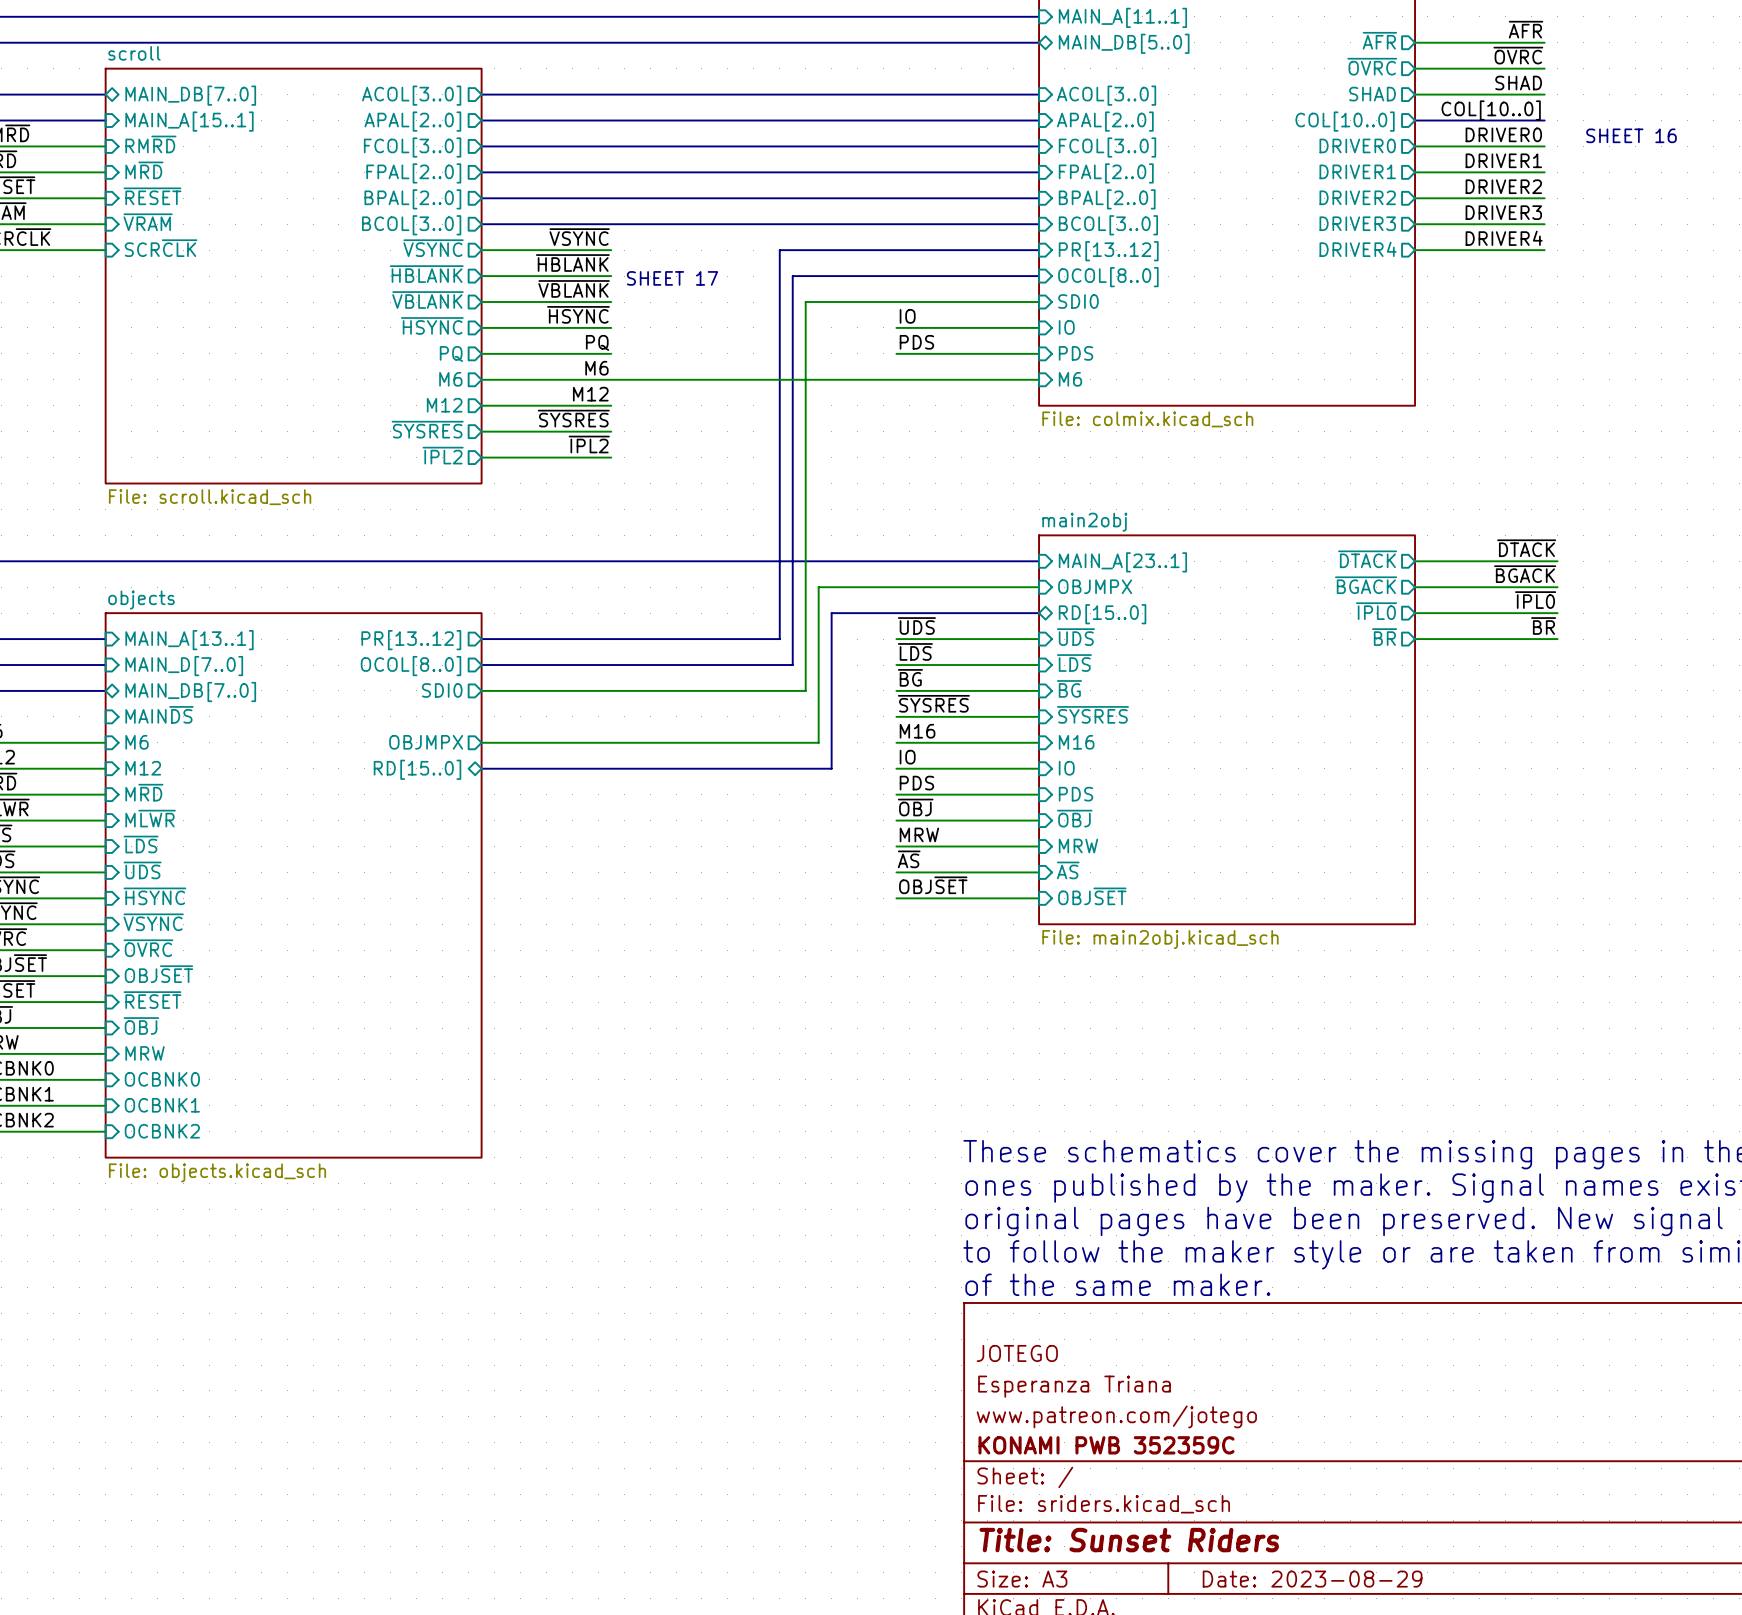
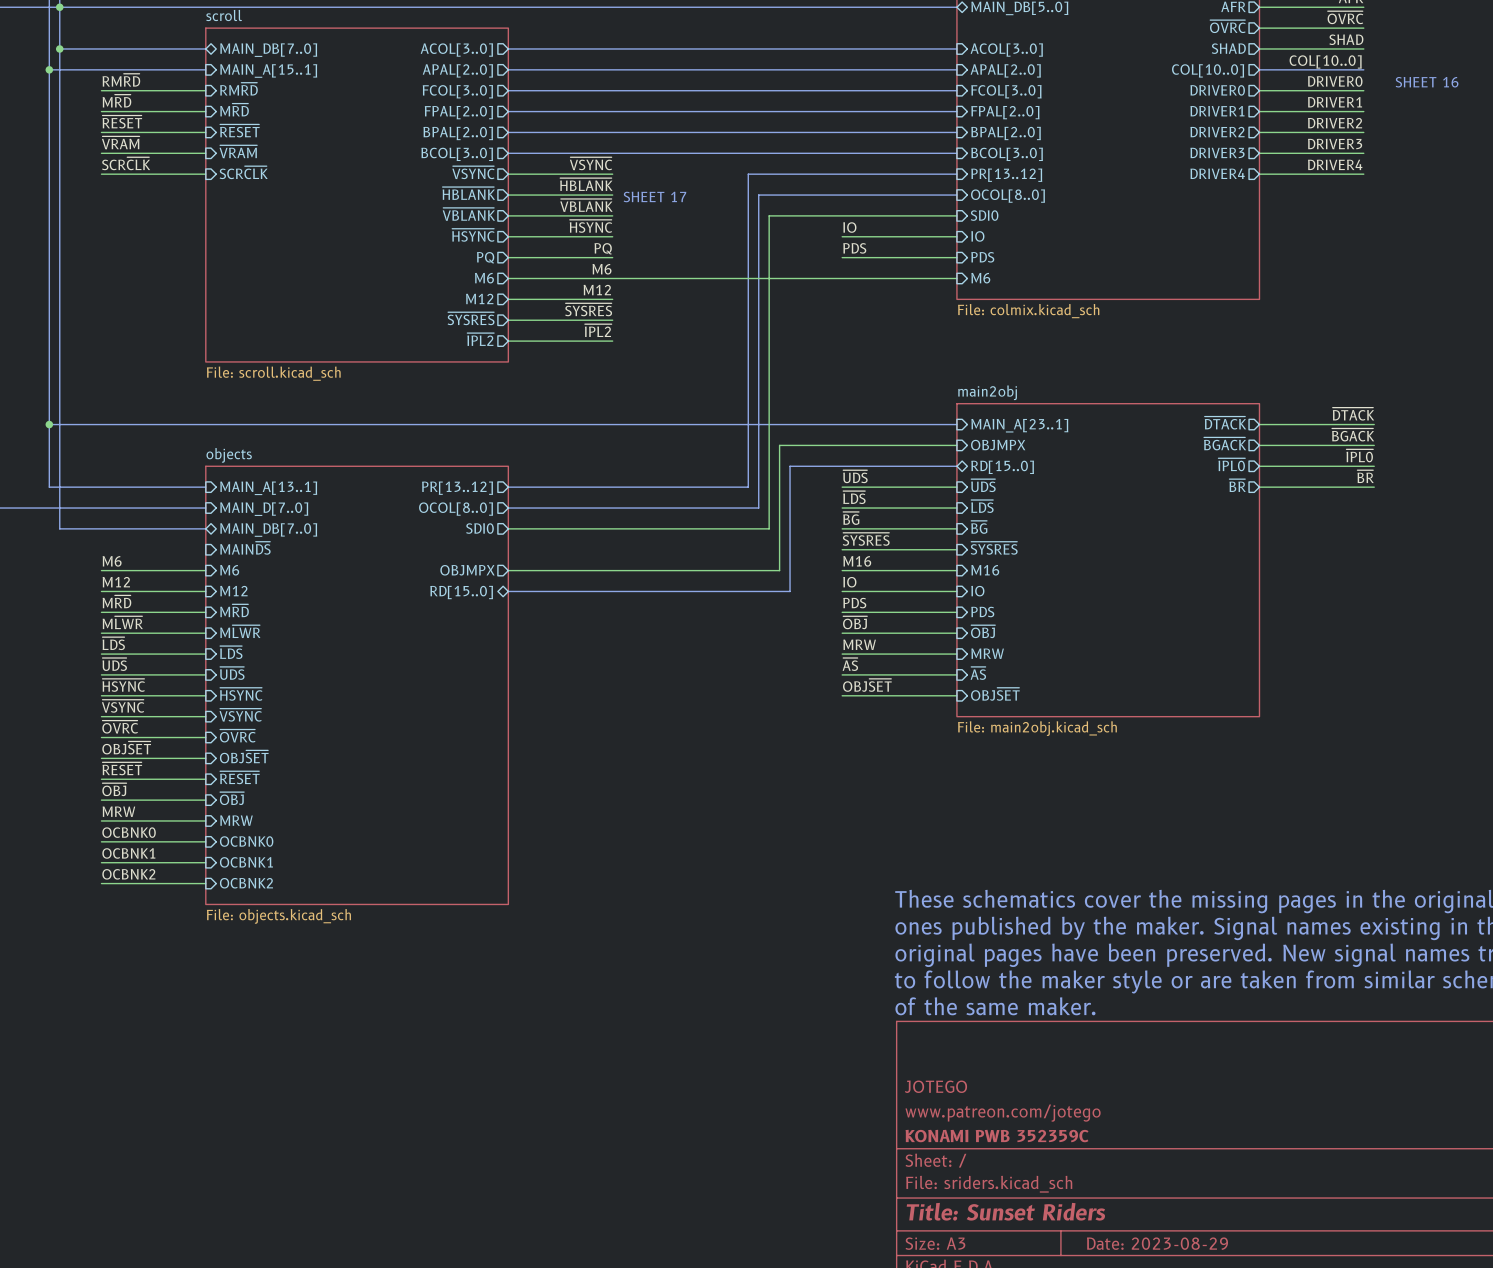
title block: JOTEGO (1017, 1353) -> none
title block: Esperanza Triana (1074, 1386) -> JOTEGO (935, 1086)

